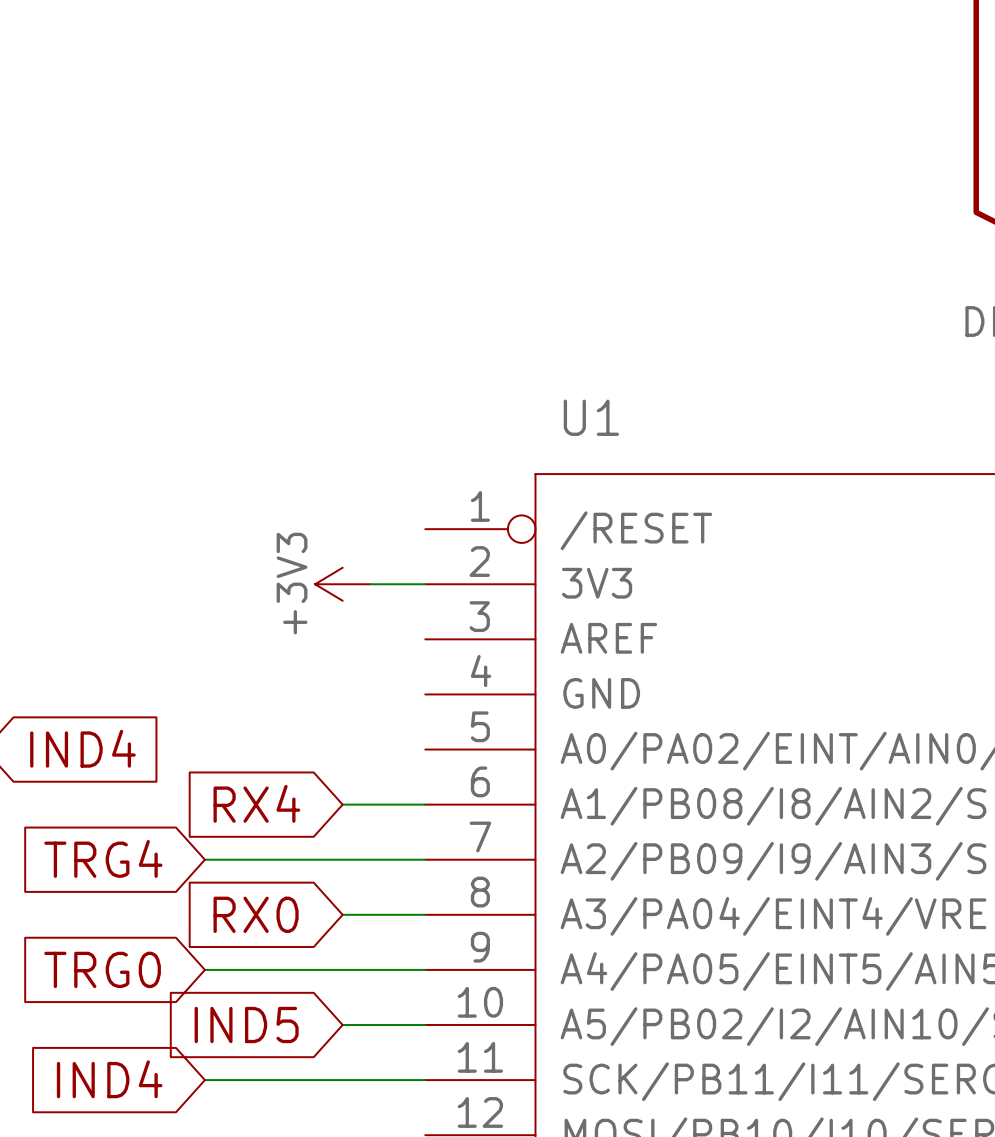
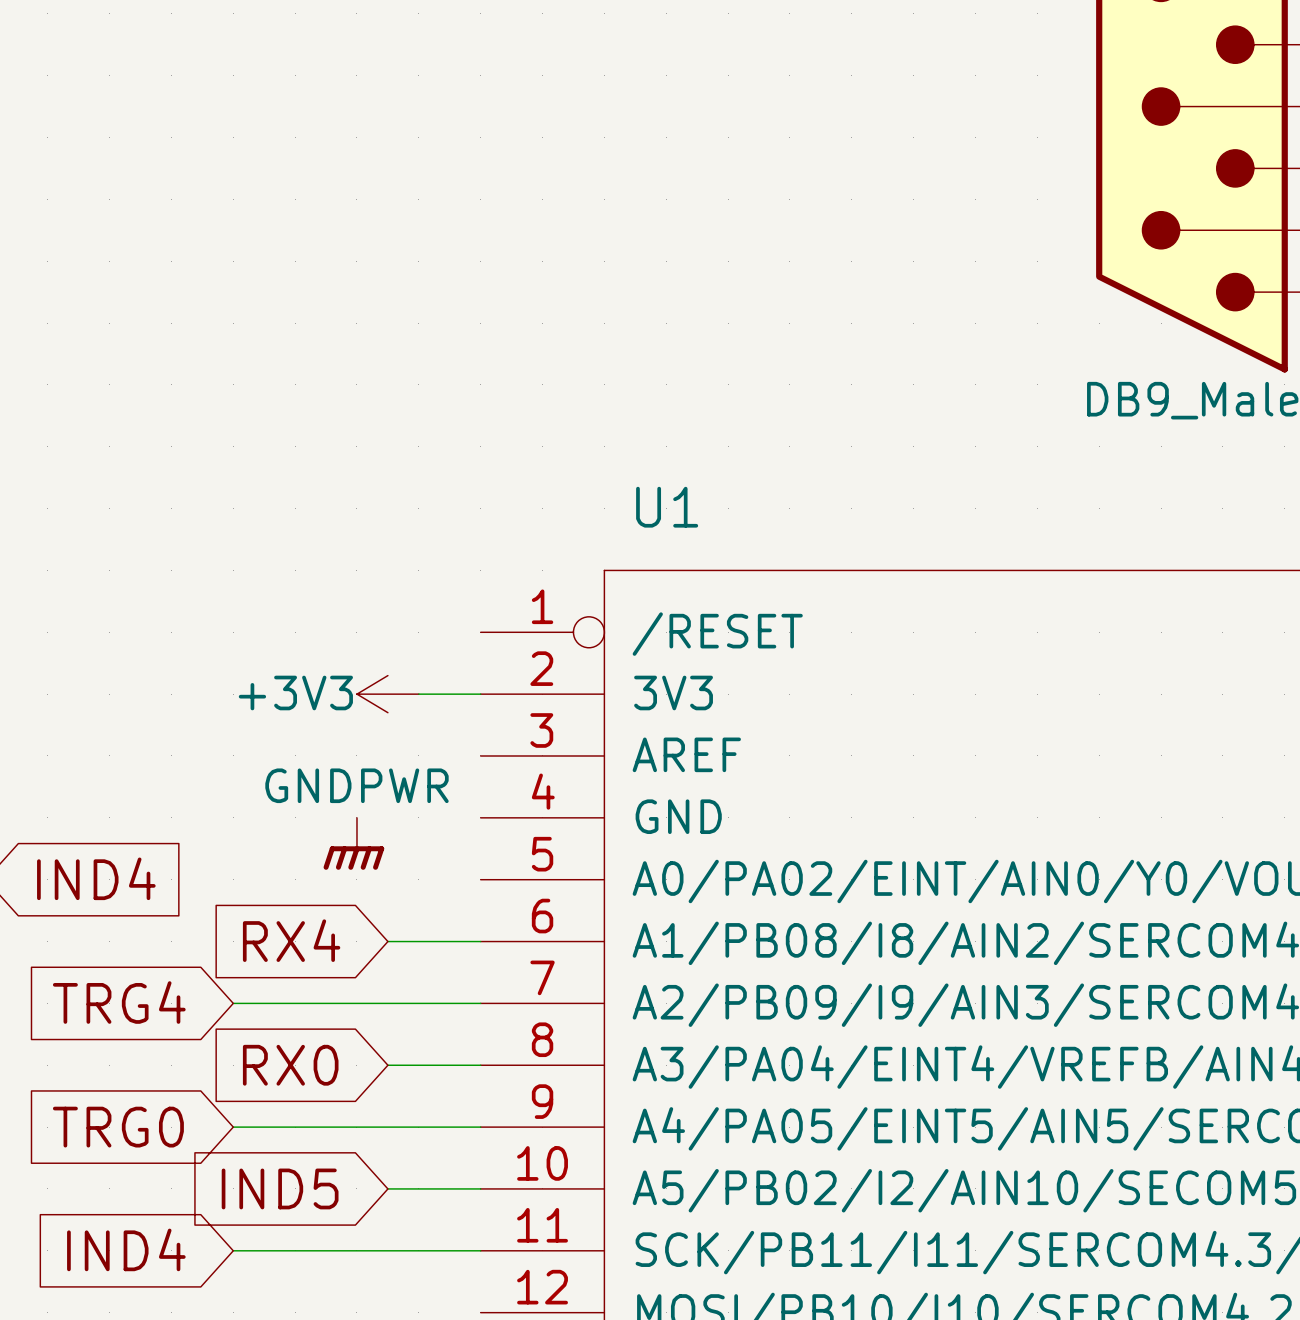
power symbol text rotation: 0° (292, 583) -> 90° clockwise (295, 692)
power symbol: none -> GNDPWR (353, 843)

